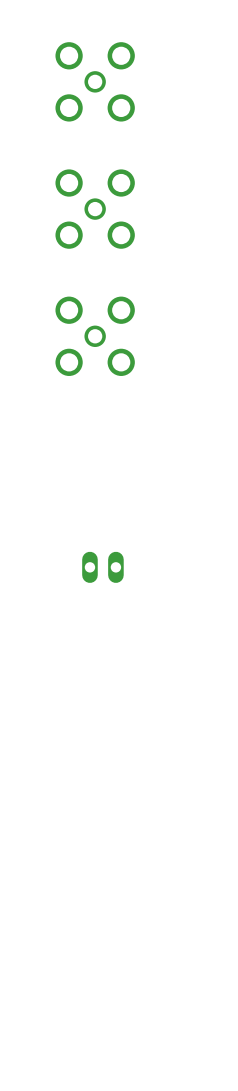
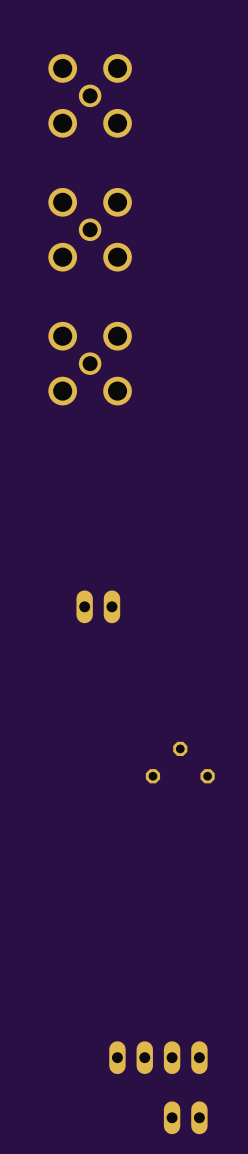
part: none -> (180, 762)
part: none -> (158, 1057)
part: none -> (185, 1117)

